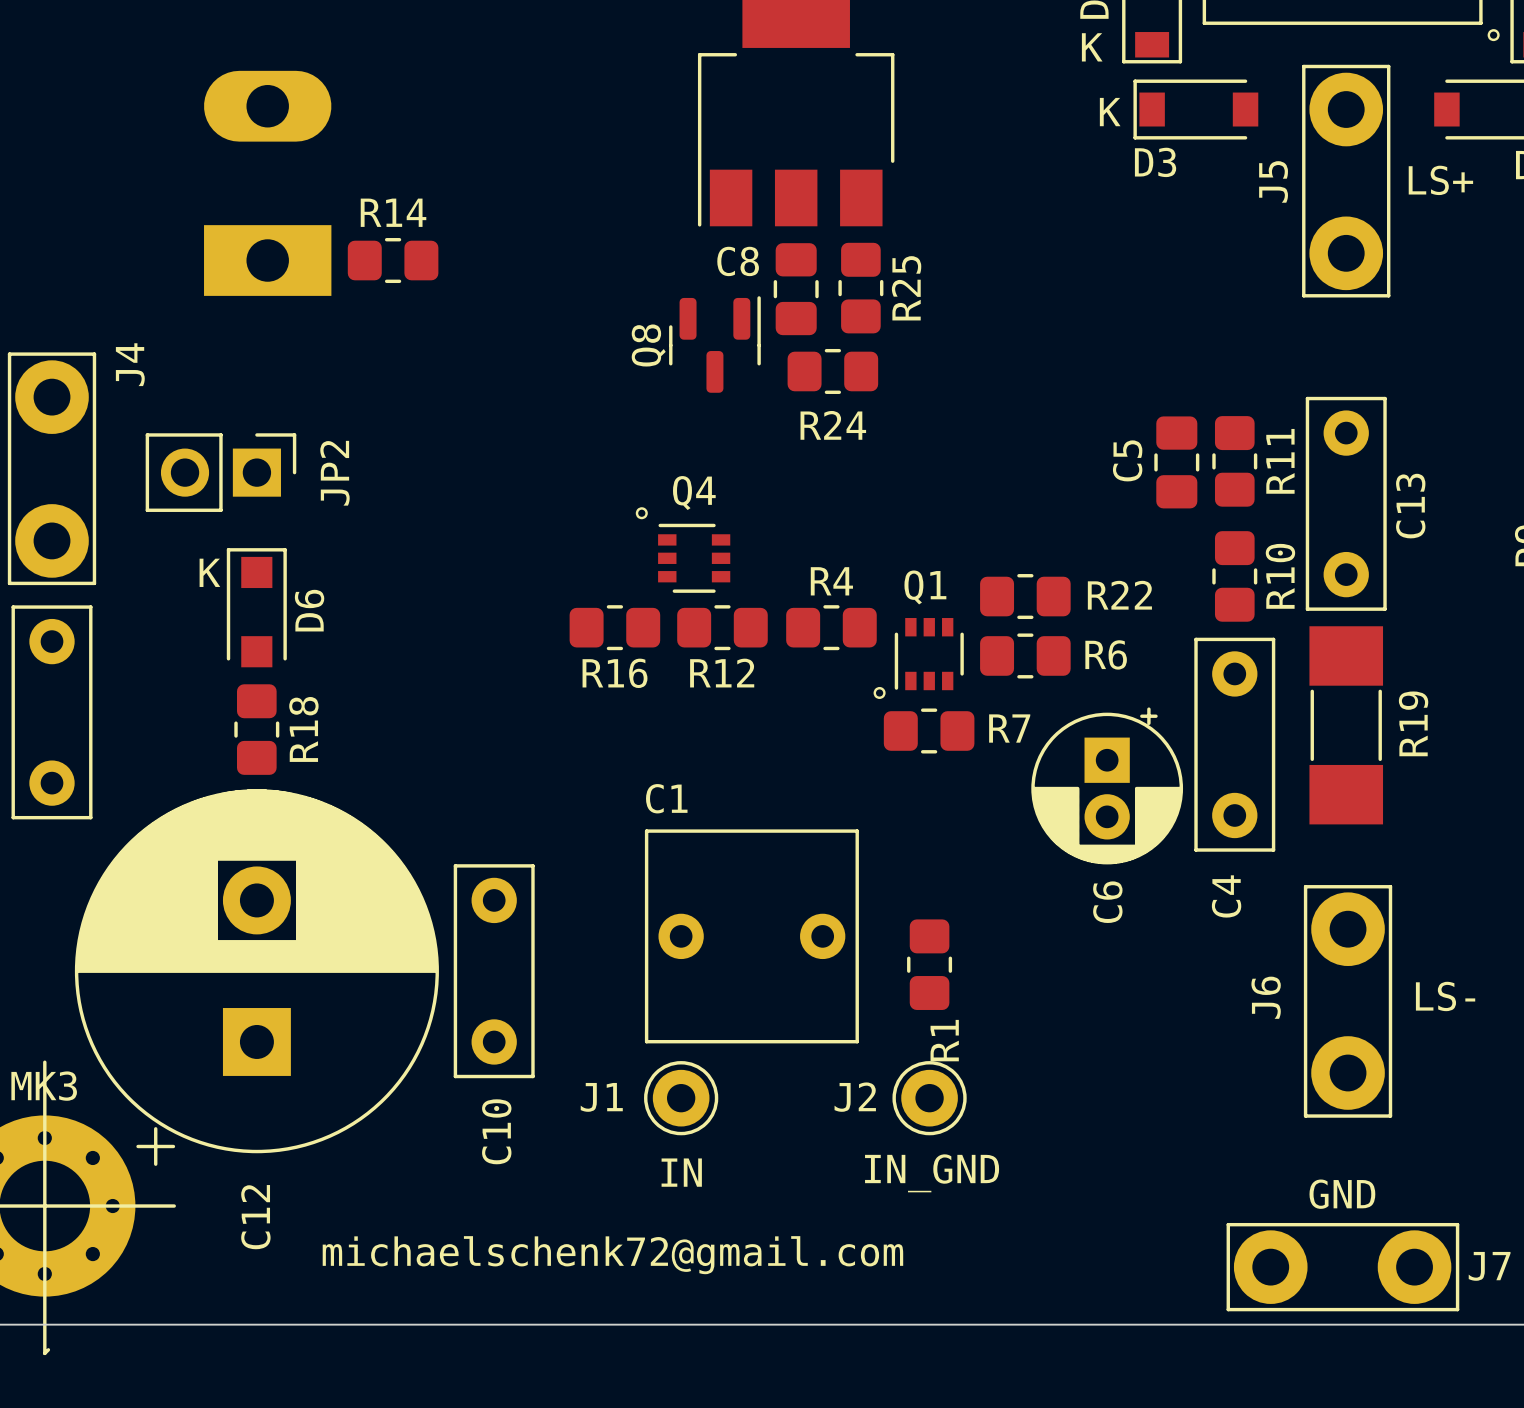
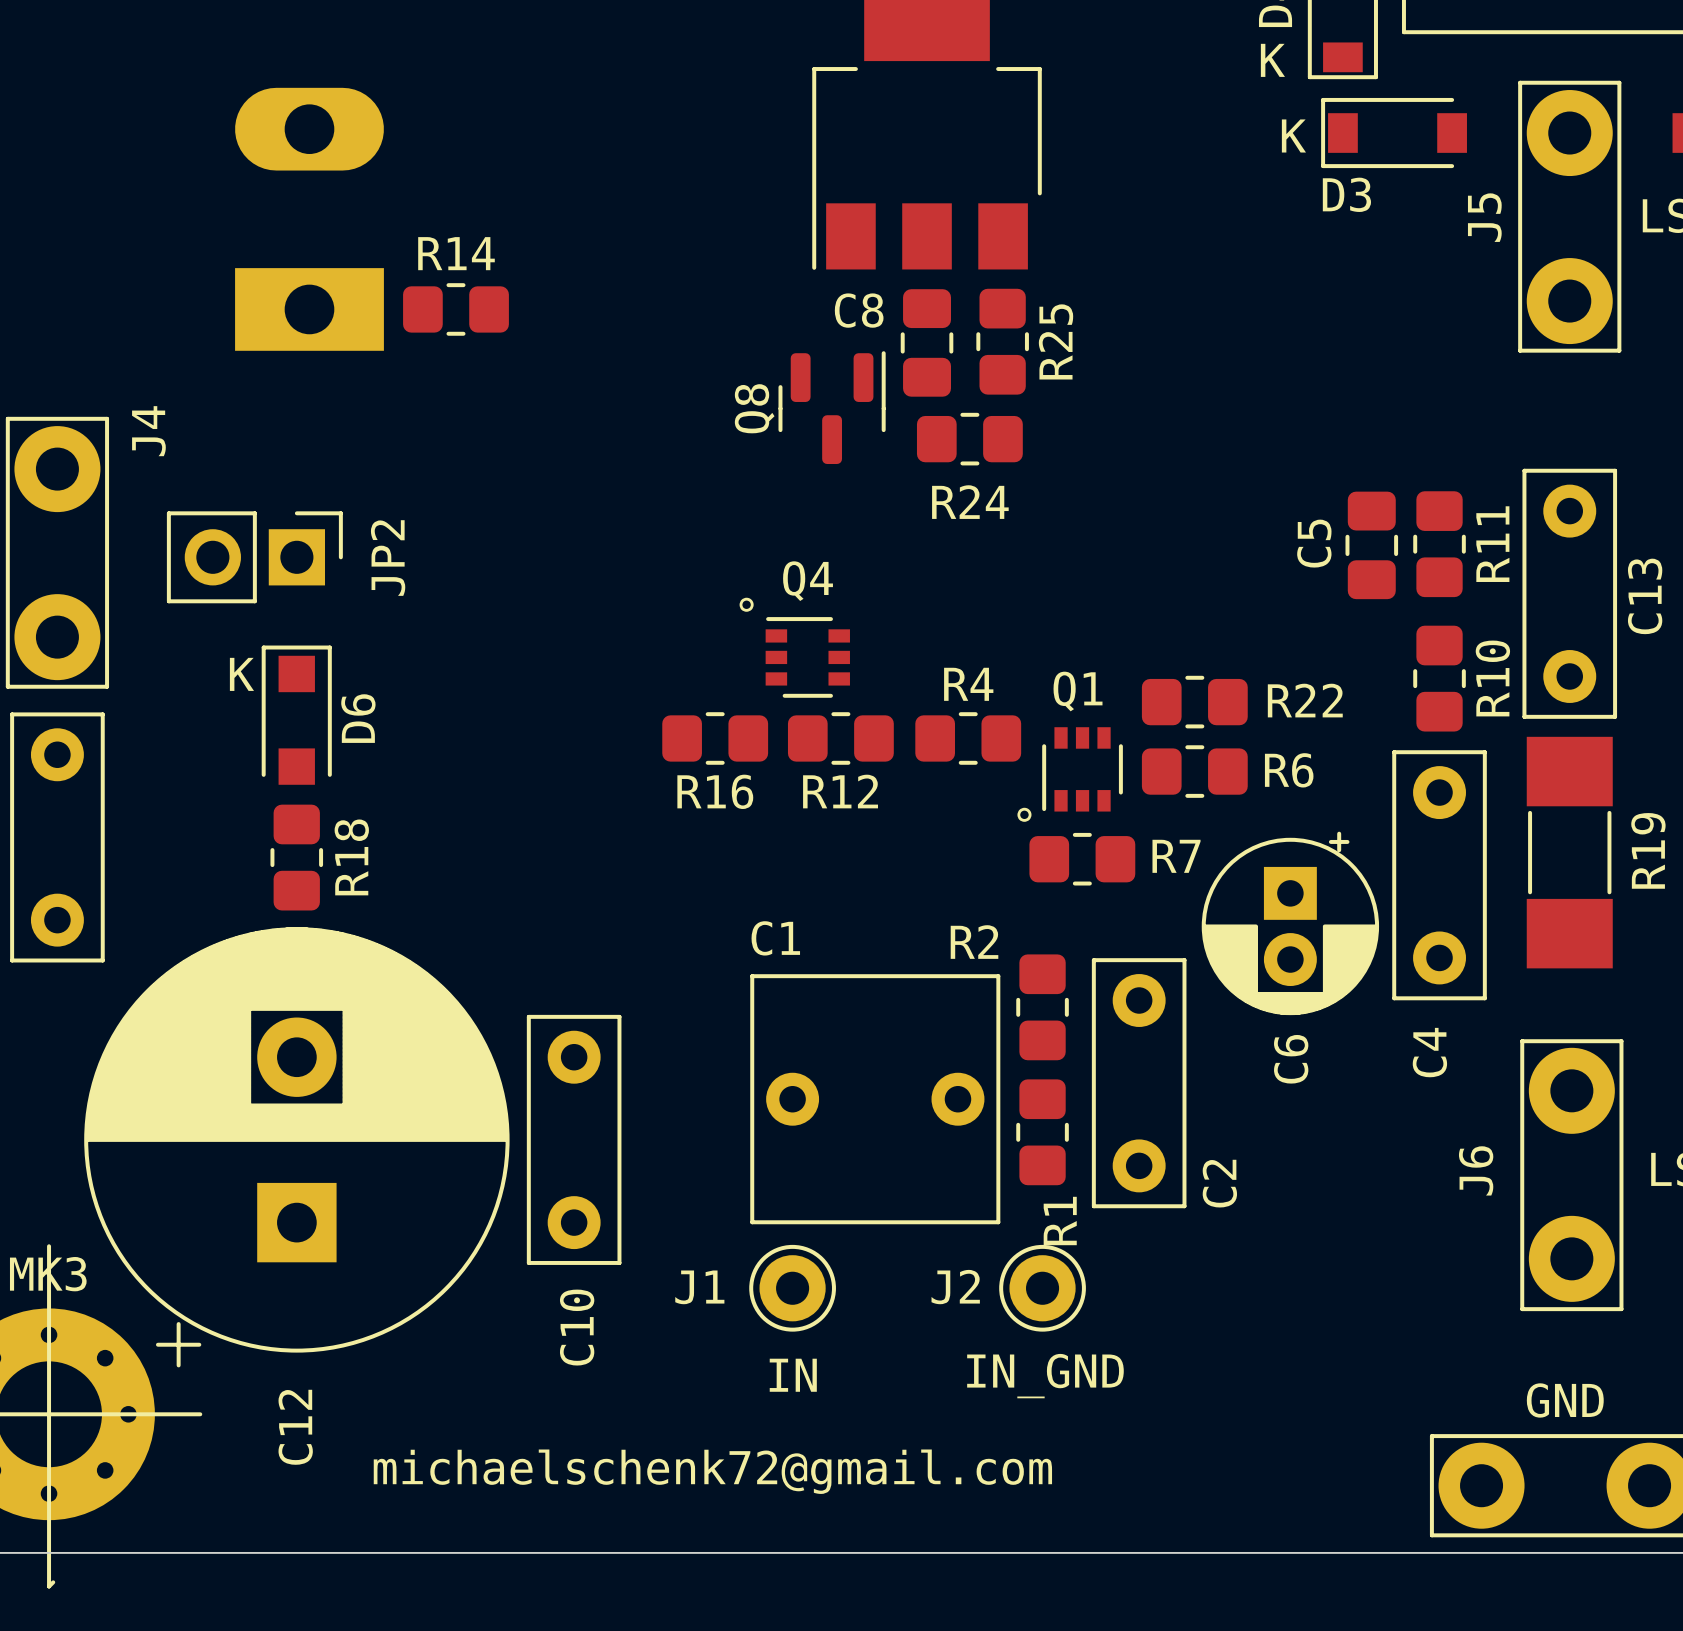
R2: none -> (1042, 1007)
C2: none -> (1139, 1083)
R1 position: (929, 964) -> (1042, 1132)
J2 position: (929, 1098) -> (1042, 1288)
text position: IN_GND (932, 1173) -> IN_GND (1045, 1376)

